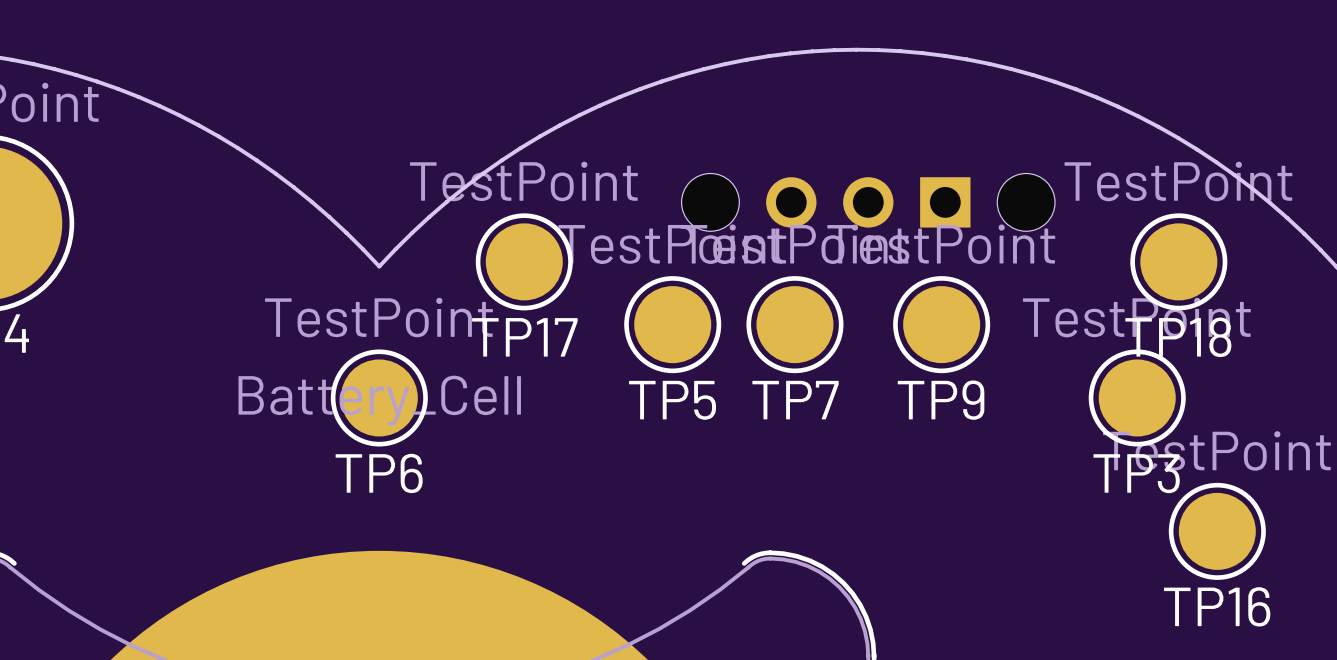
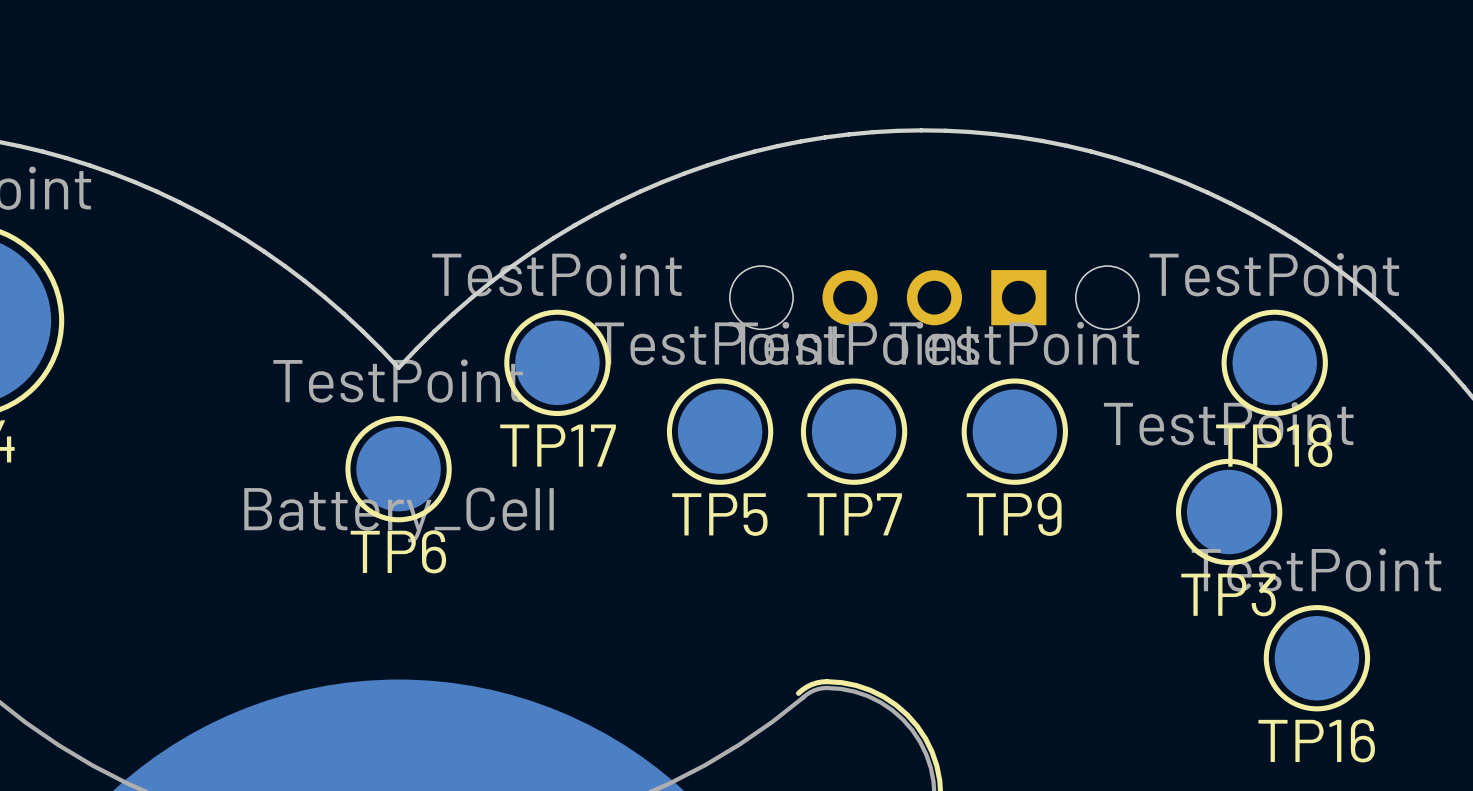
TP6 position: (379, 397) -> (398, 469)

